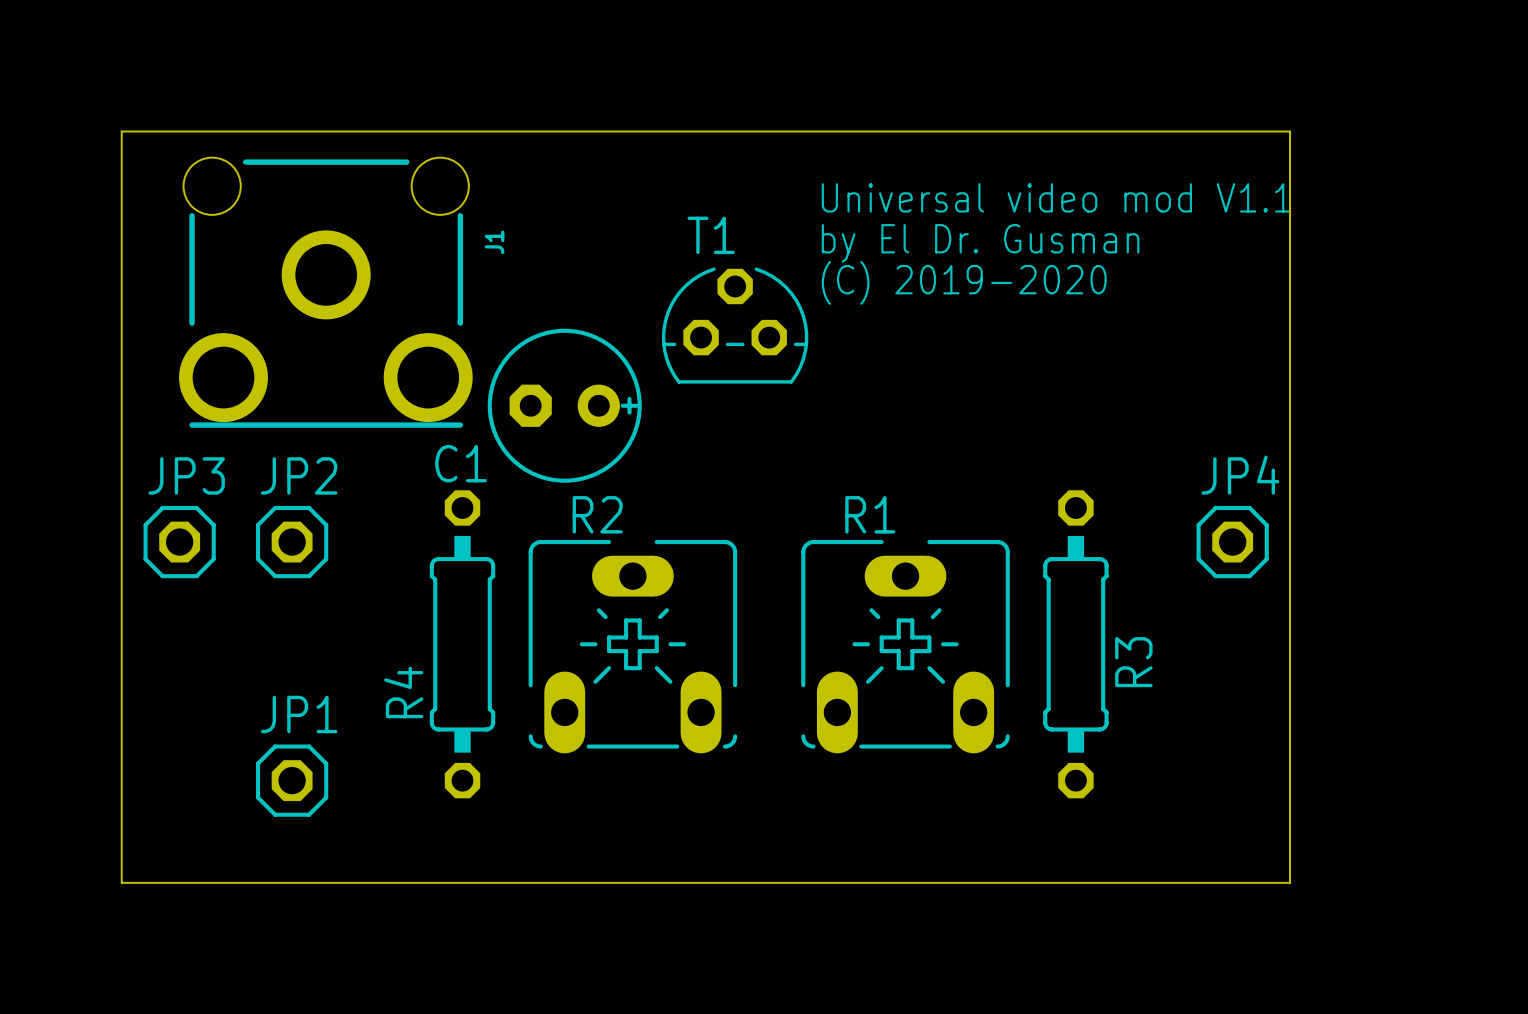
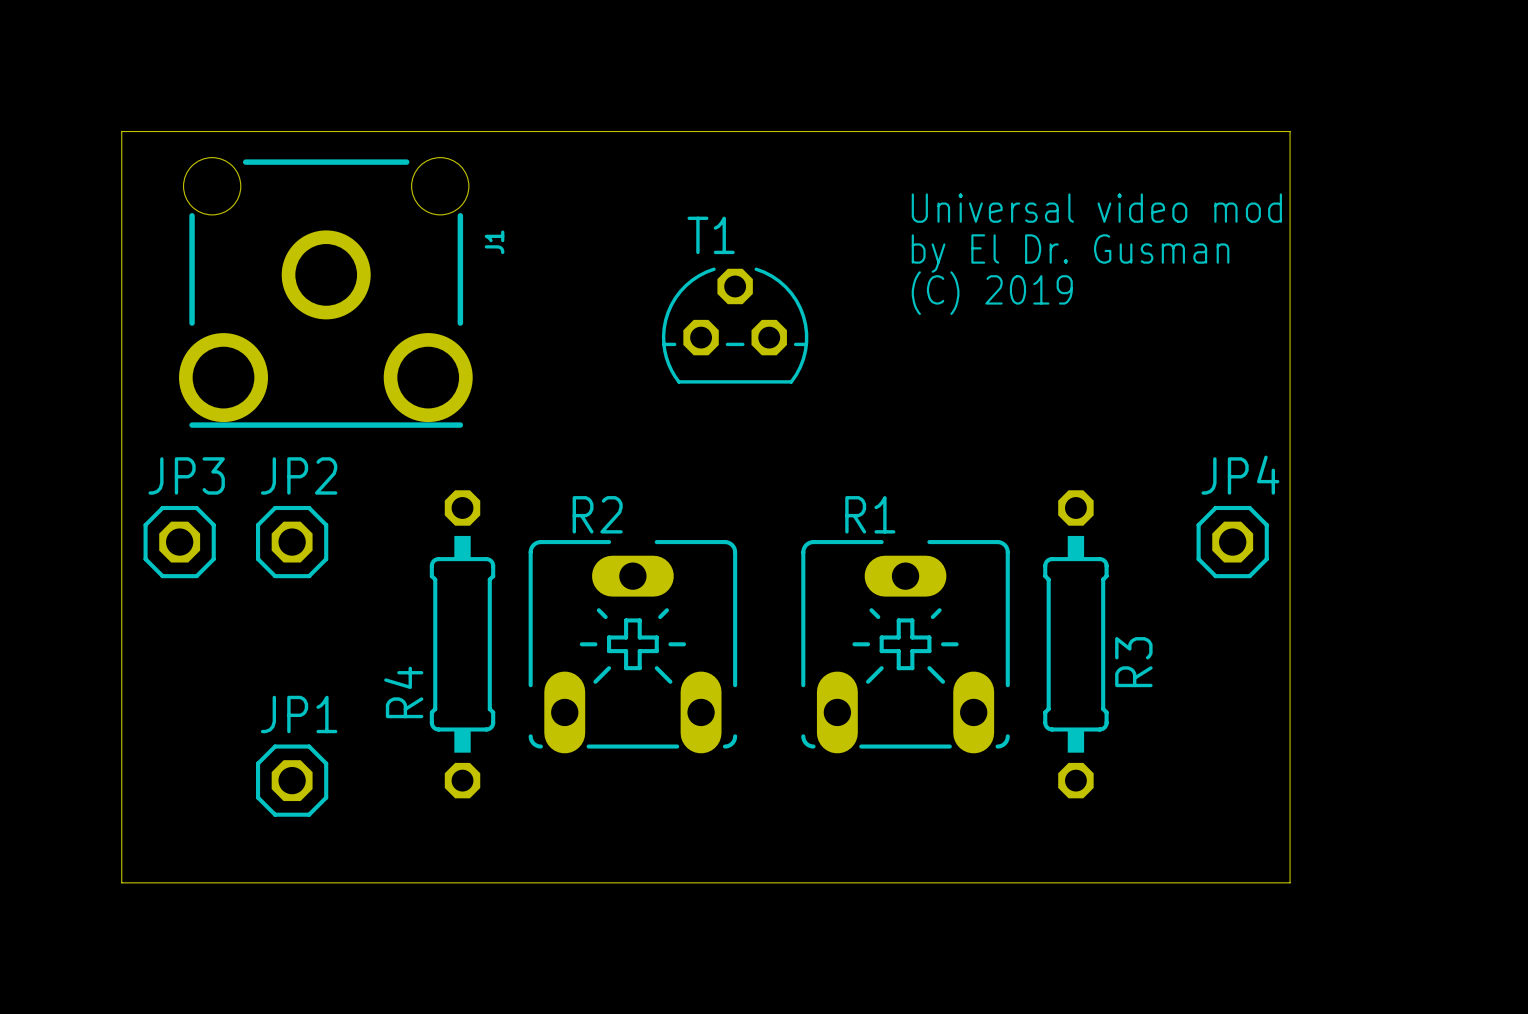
text: Universal video mod V1.1 (1056, 197) -> Universal video mod (1096, 208)
text position: by El Dr. Gusman (980, 243) -> by El Dr. Gusman (1070, 253)
text: (C) 2019-2020 (964, 282) -> (C) 2019 (992, 293)
C1: (564, 405) -> none

